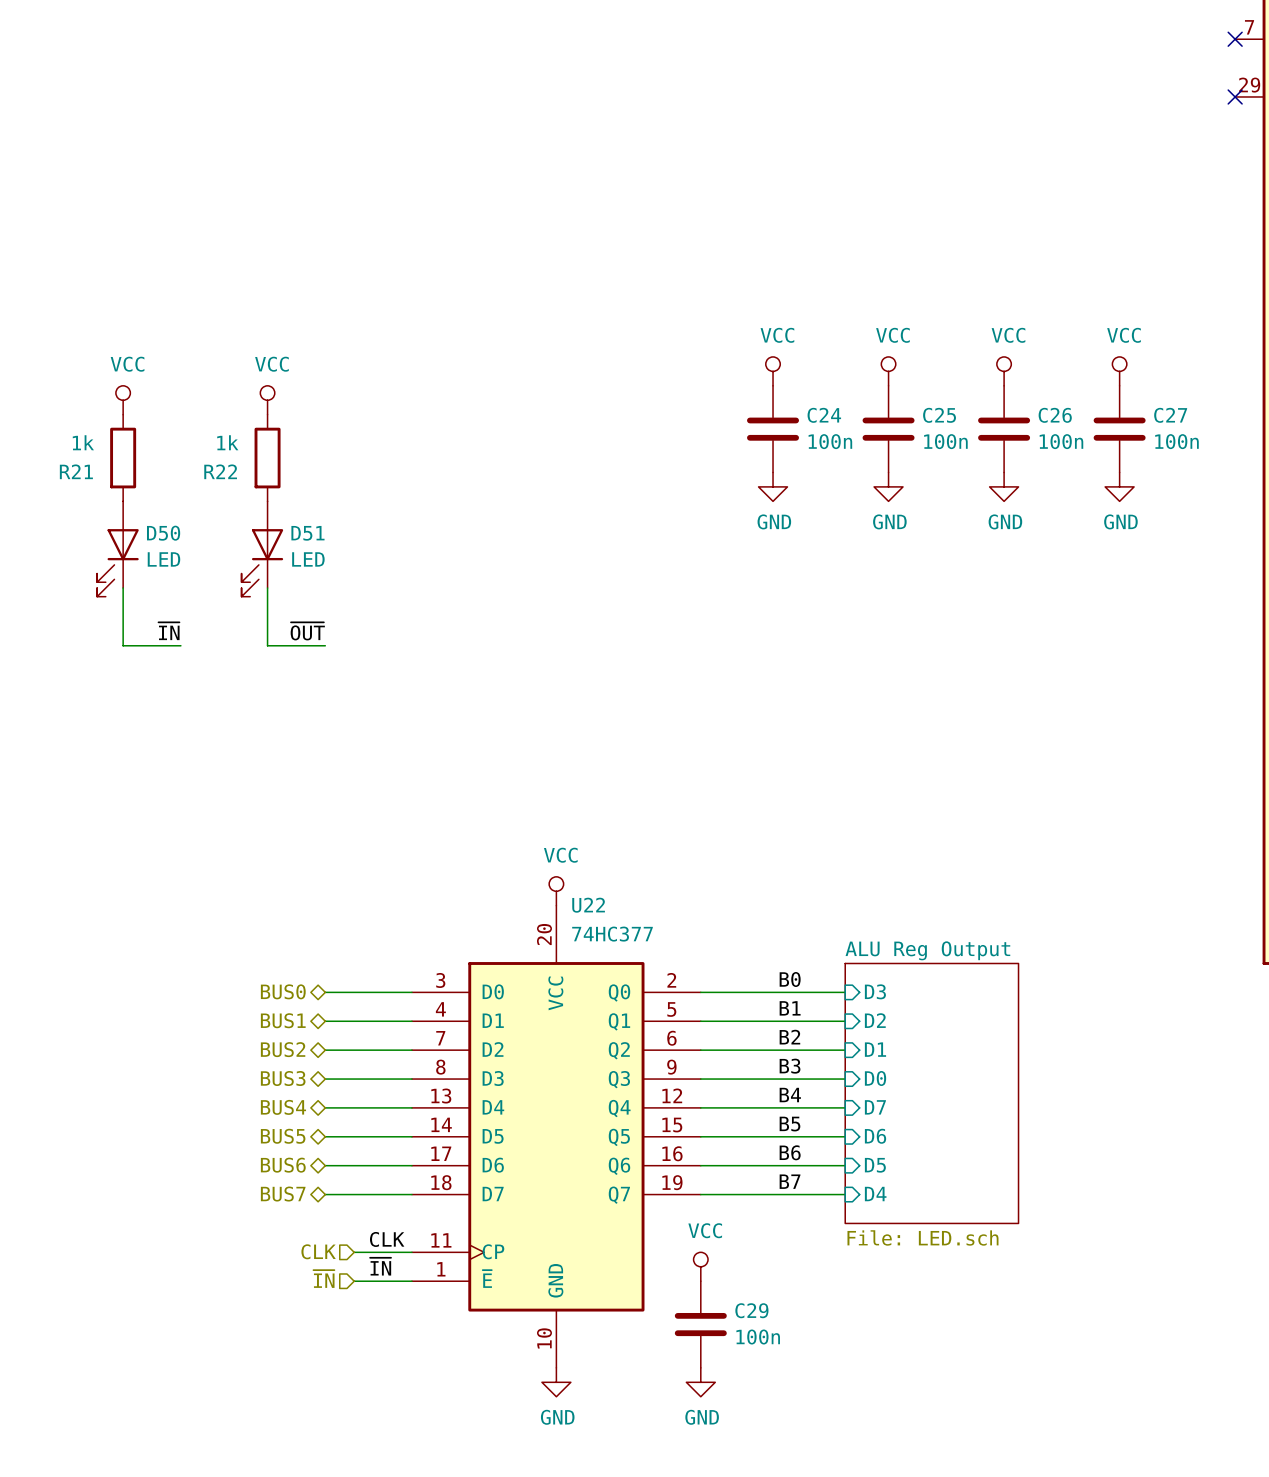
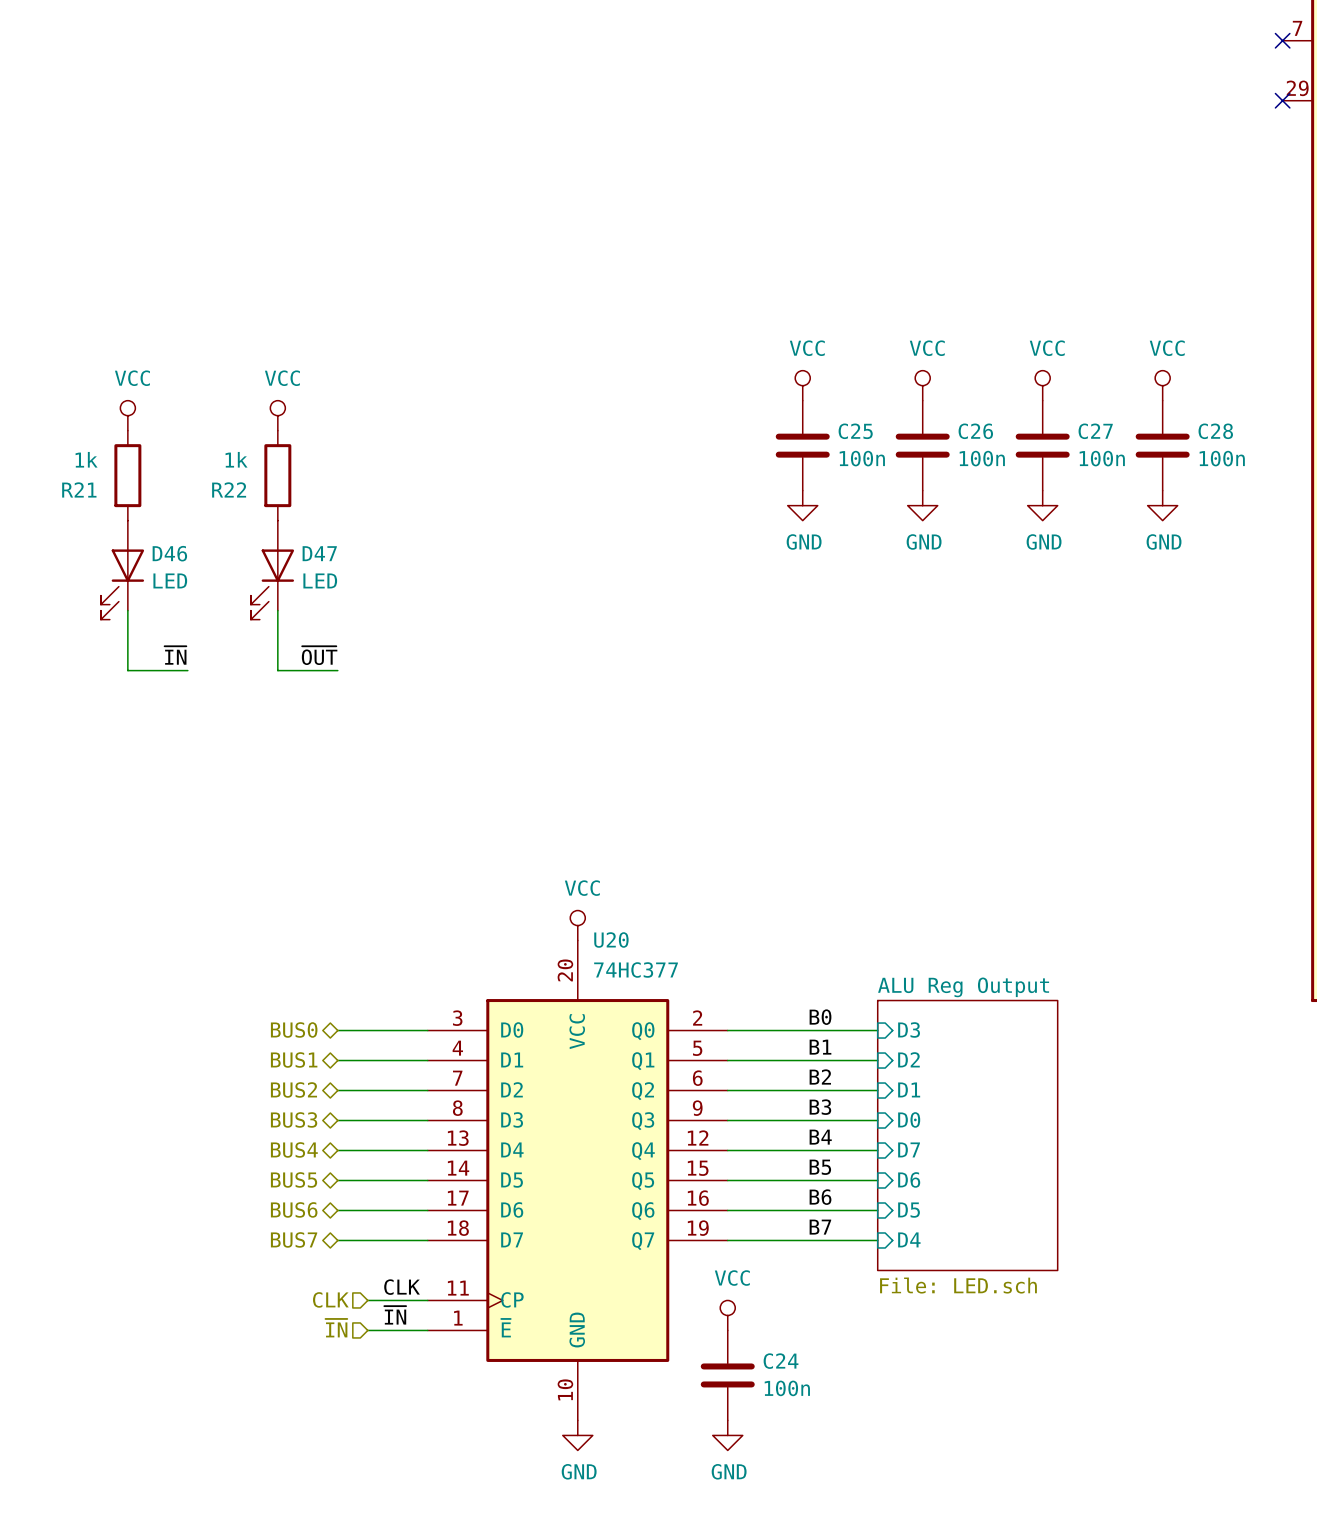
C24 name: C24 (824, 415) -> C25 (855, 431)
C25 name: C25 (939, 415) -> C26 (975, 431)
C26 name: C26 (1055, 415) -> C27 (1095, 431)
C27 name: C27 (1170, 415) -> C28 (1215, 431)
D50 name: D50 (163, 533) -> D46 (169, 553)
D51 name: D51 (307, 533) -> D47 (319, 553)
U22 name: U22 (588, 905) -> U20 (611, 940)
C29 name: C29 (751, 1310) -> C24 (781, 1361)

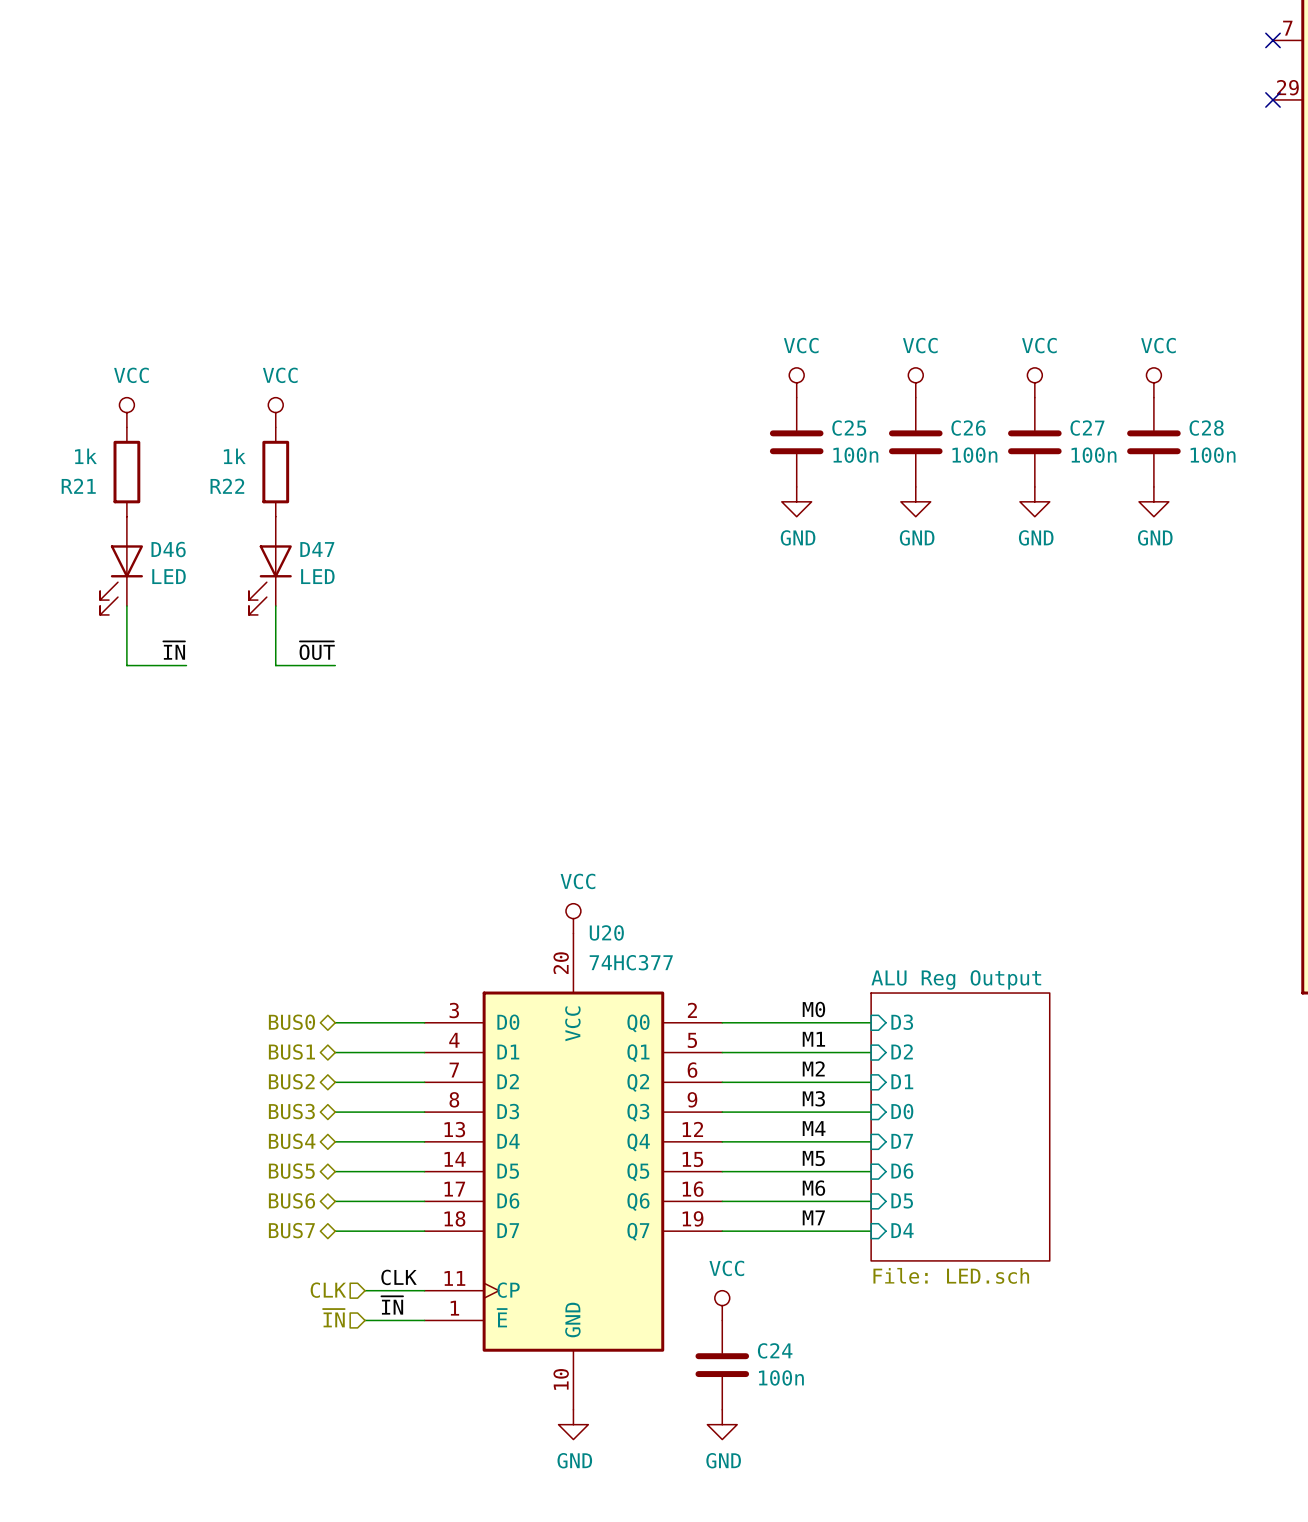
label: B0 (820, 1017) -> M0 (813, 1009)
label: B1 (820, 1047) -> M1 (813, 1039)
label: B2 (820, 1077) -> M2 (813, 1068)
label: B3 (820, 1107) -> M3 (813, 1098)
label: B4 (820, 1137) -> M4 (814, 1128)
label: B5 (820, 1167) -> M5 (813, 1158)
label: B6 (820, 1197) -> M6 (813, 1188)
label: B7 (820, 1227) -> M7 (813, 1217)

